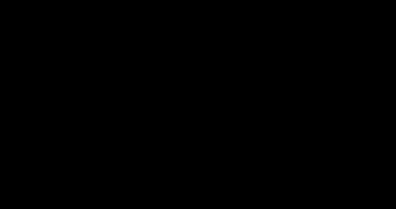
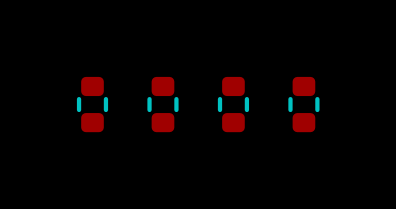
part: none -> (92, 104)
part: none -> (162, 104)
part: none -> (233, 104)
part: none -> (303, 104)

